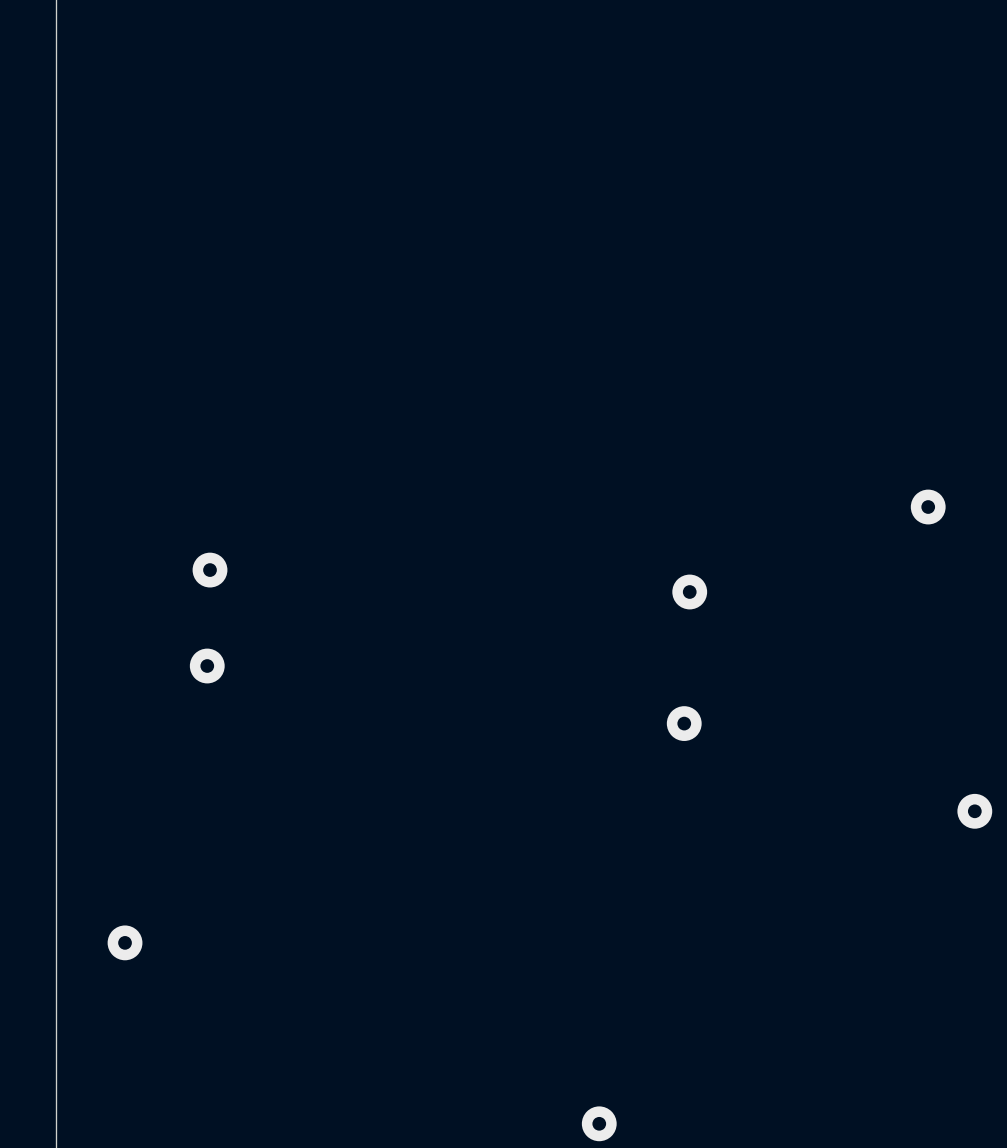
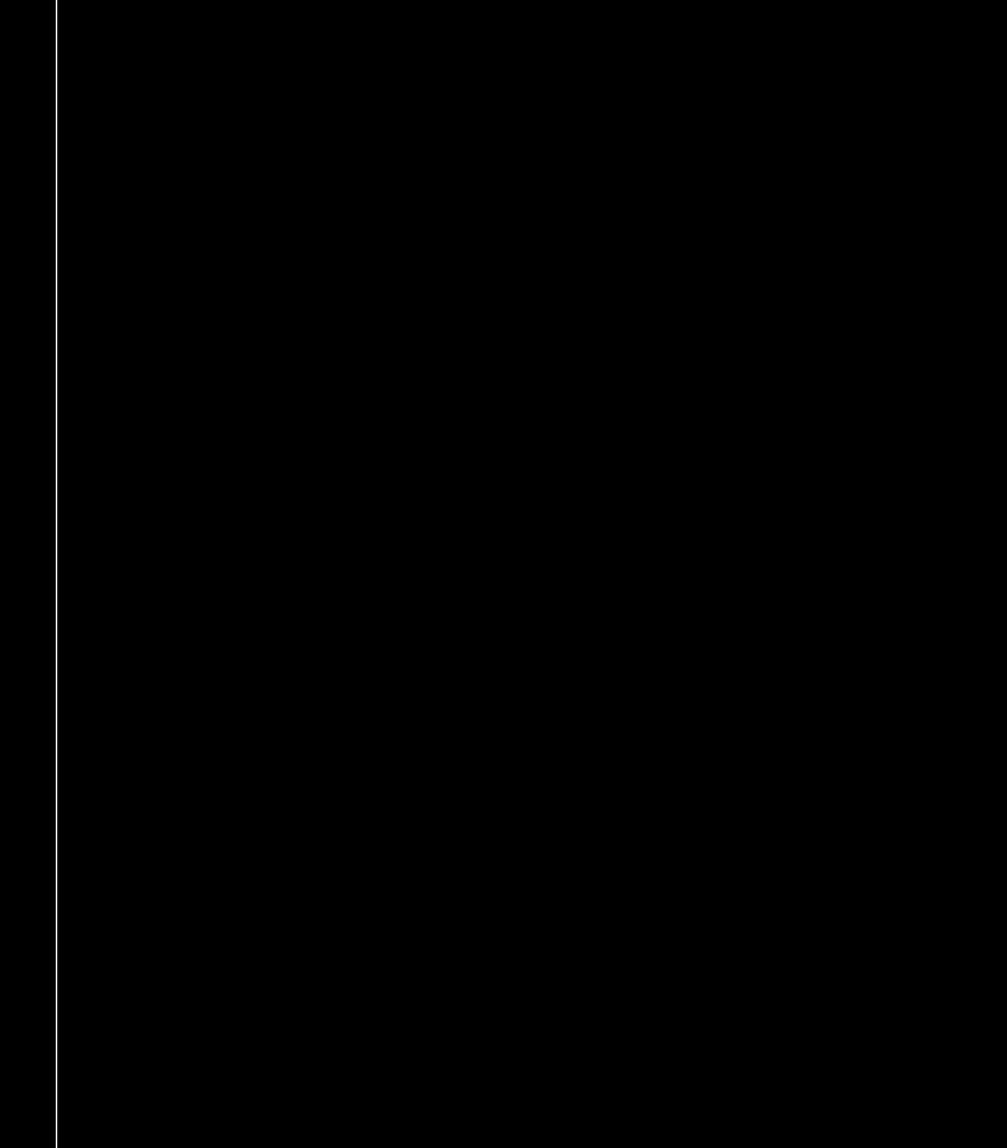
via: (928, 507) -> none
via: (210, 570) -> none
via: (689, 592) -> none
via: (207, 666) -> none
via: (684, 723) -> none
via: (974, 811) -> none
via: (125, 942) -> none
via: (599, 1123) -> none

